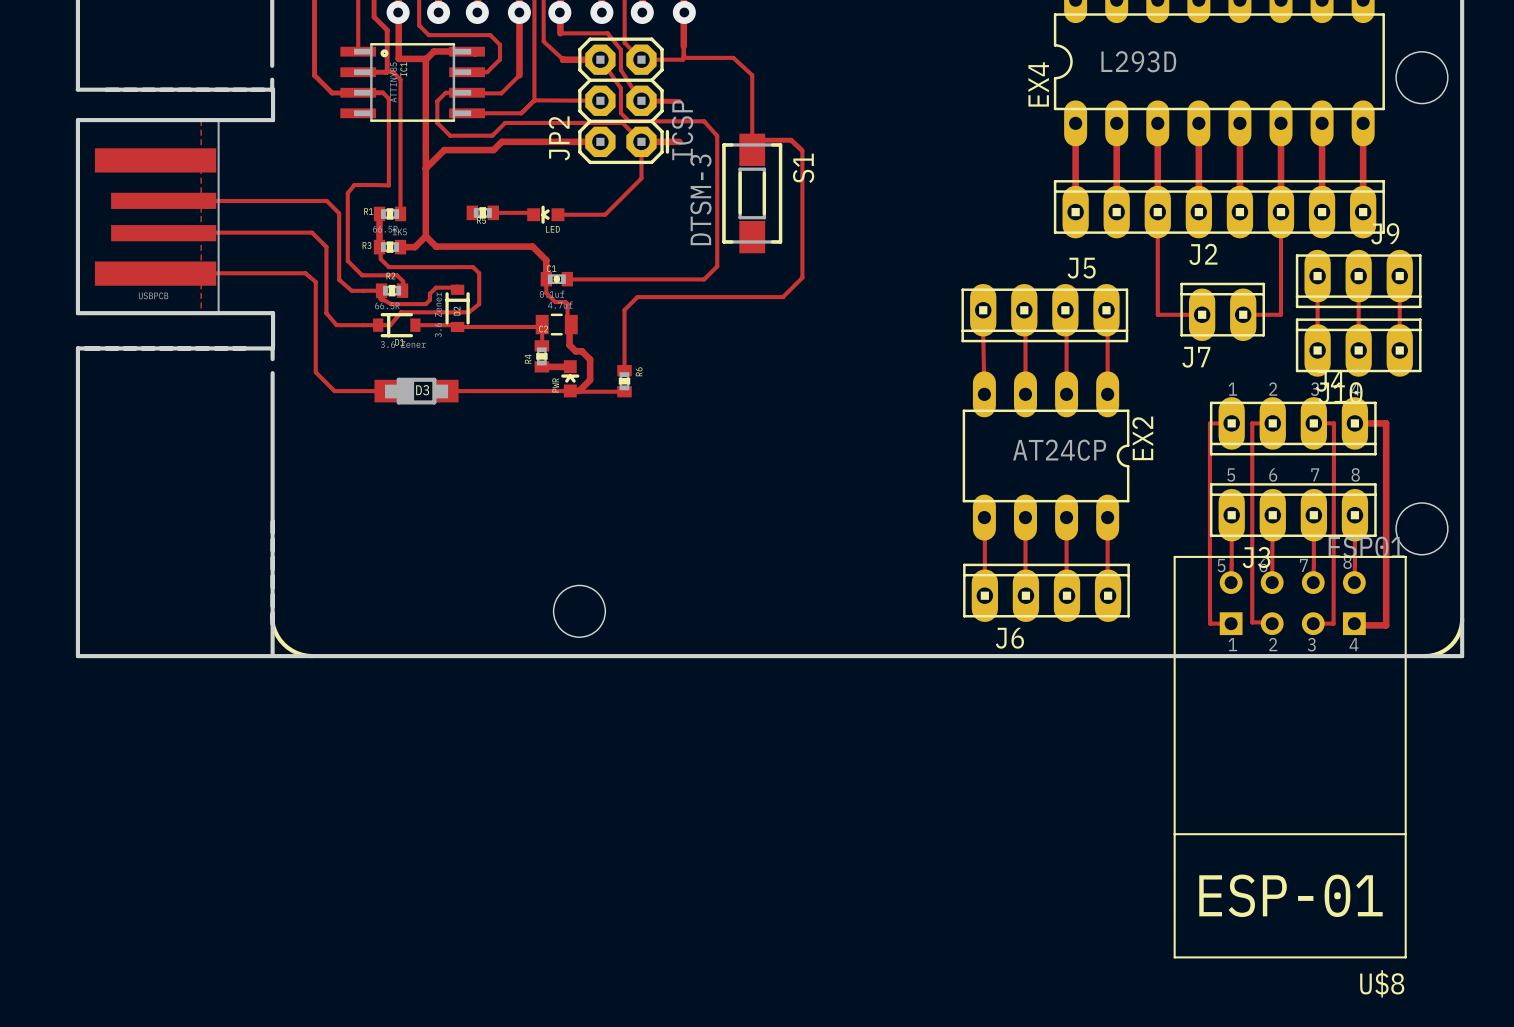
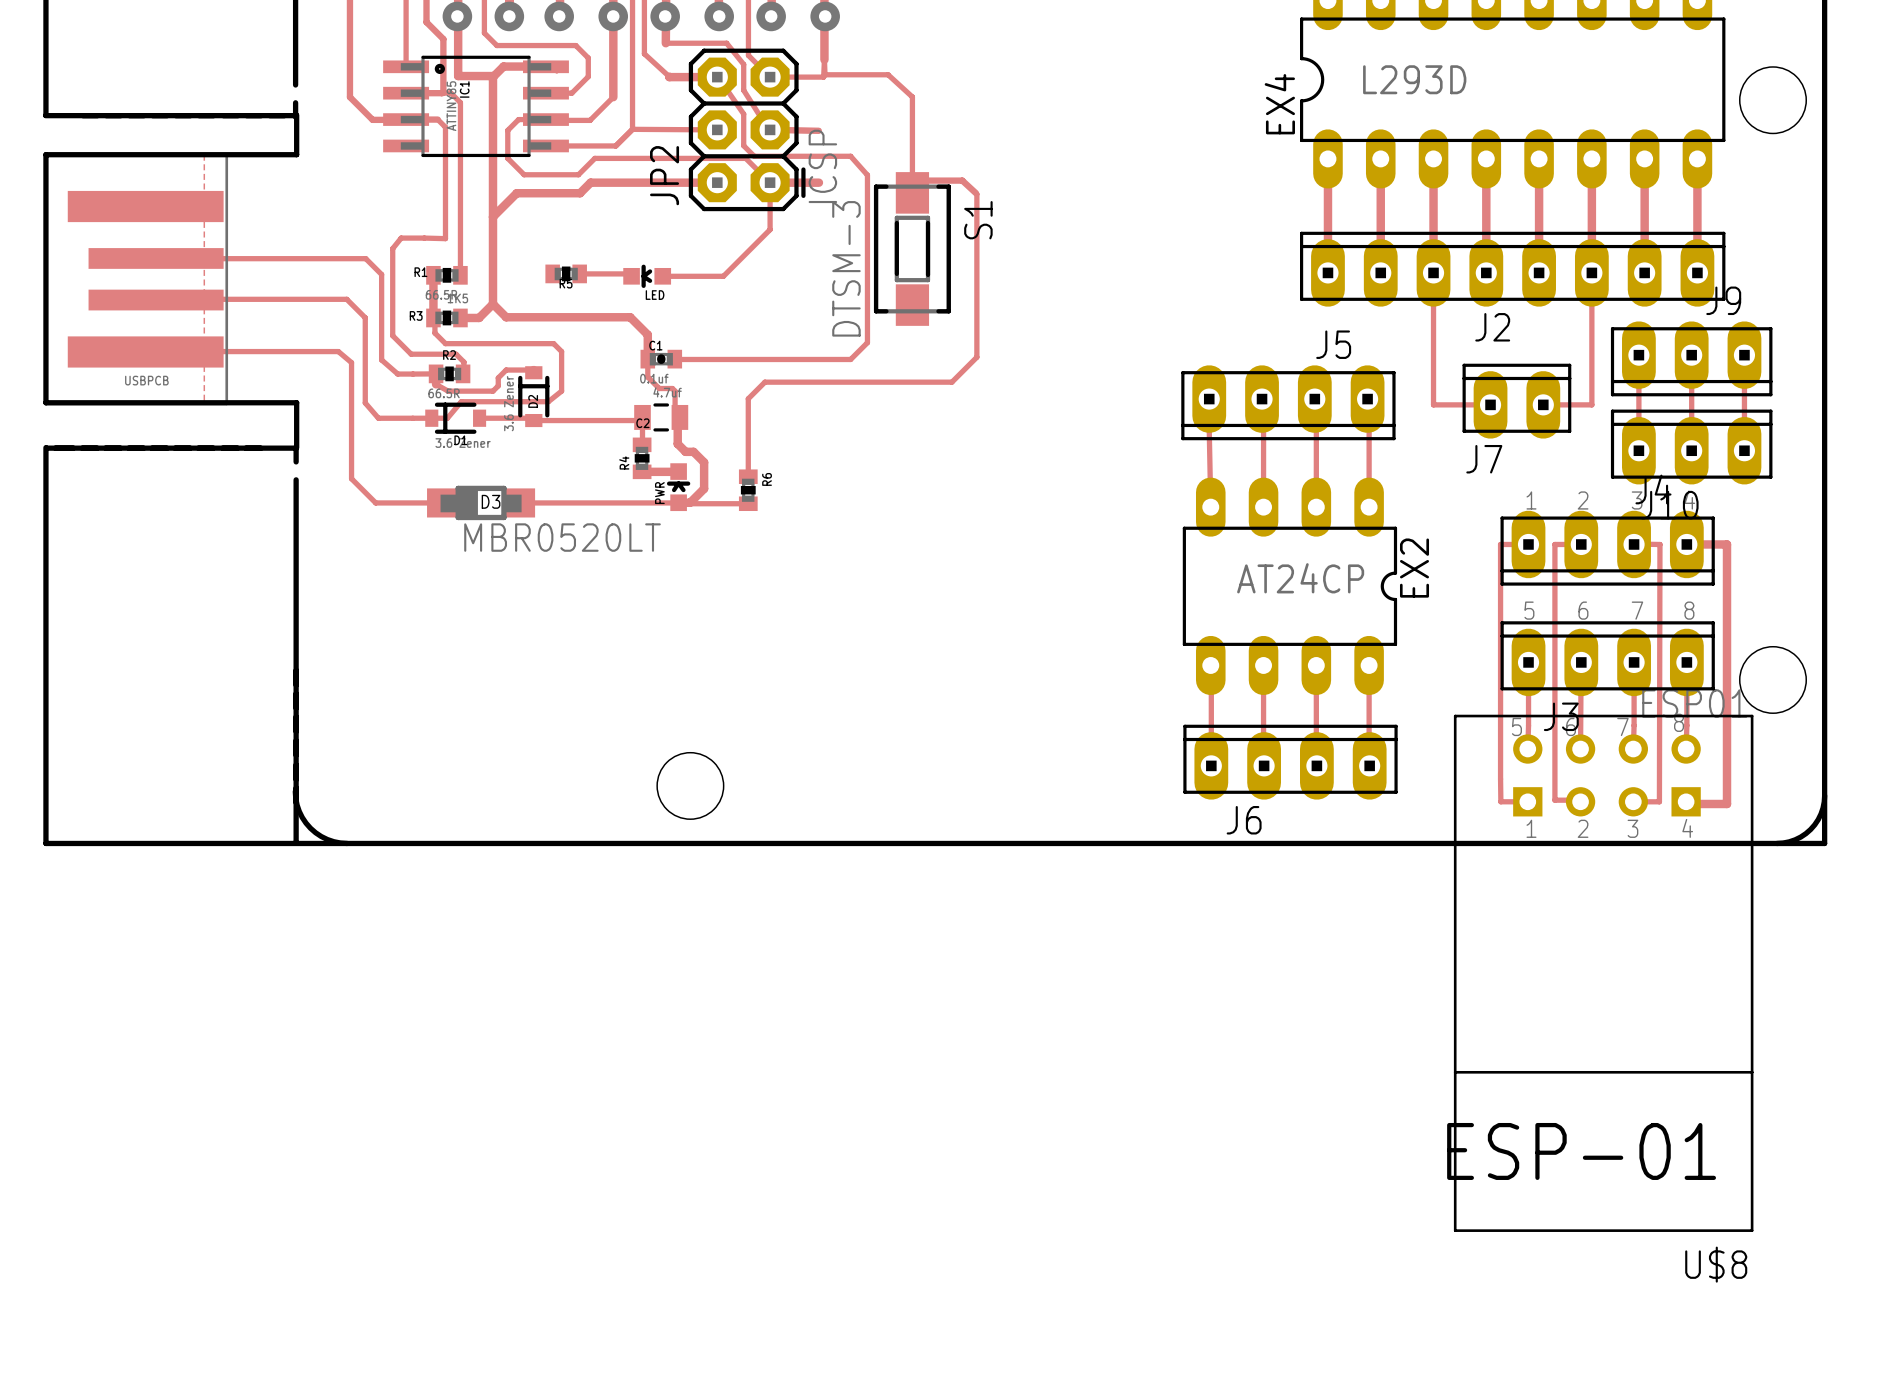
D3 value: none -> MBR0520LT (562, 537)

